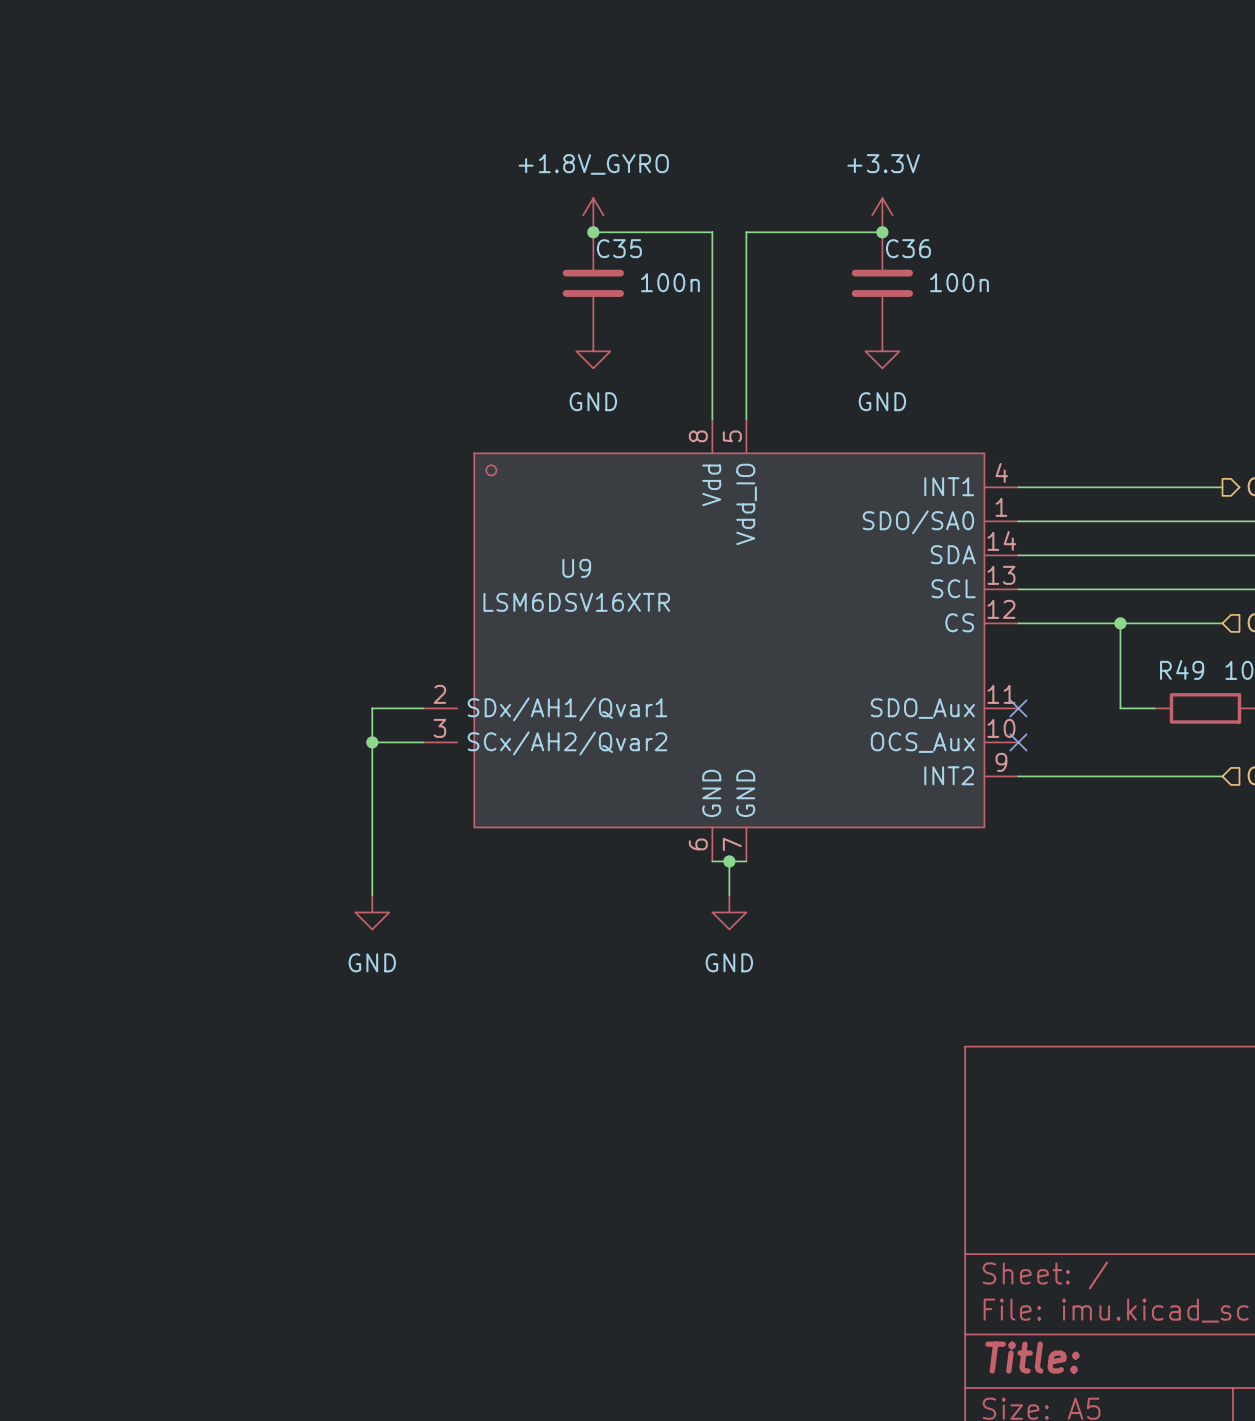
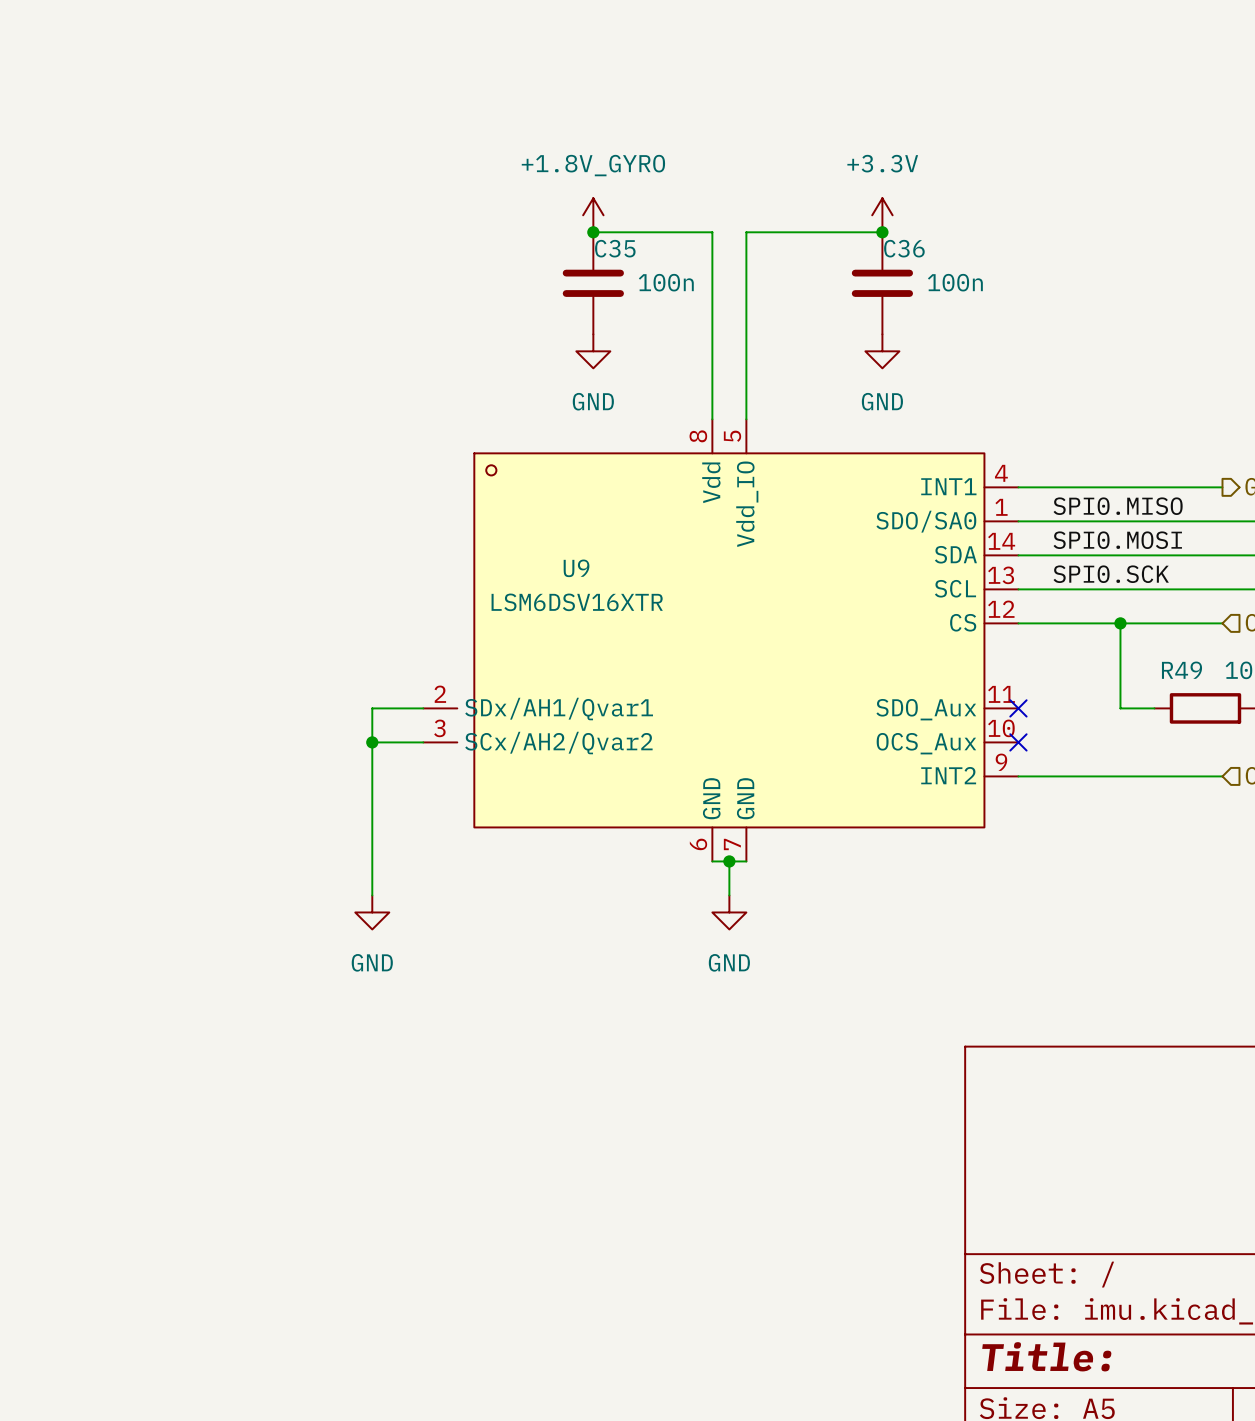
label: none -> SPI0.MISO (1118, 506)
label: none -> SPI0.MOSI (1117, 540)
label: none -> SPI0.SCK (1111, 574)

